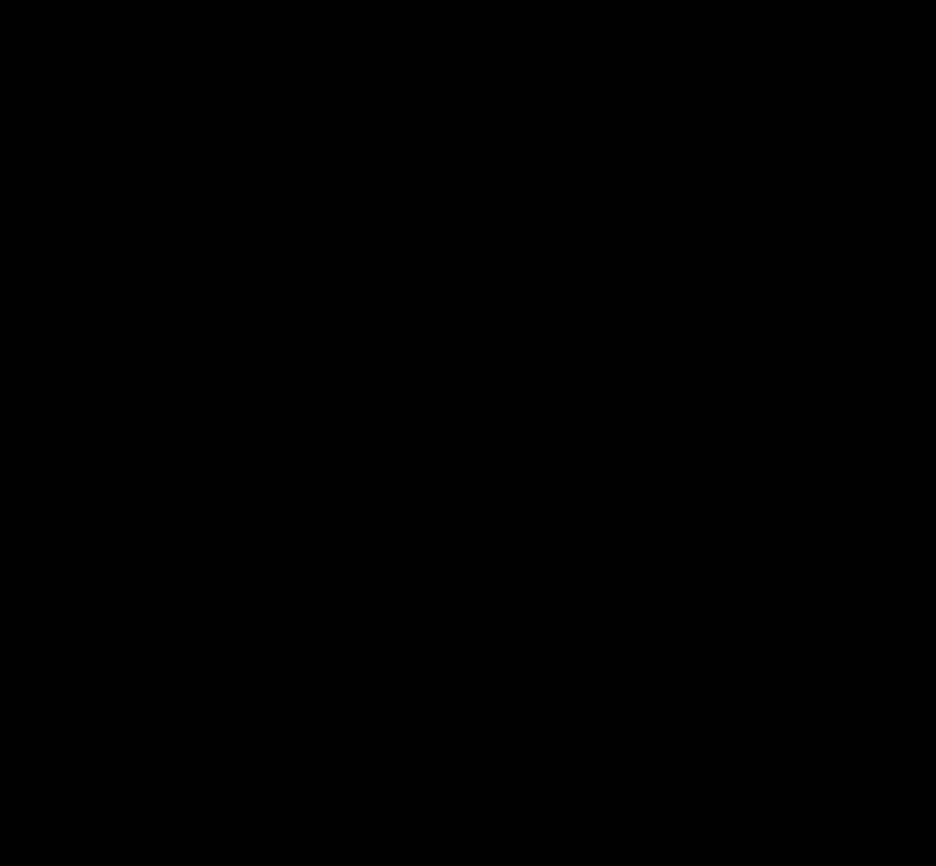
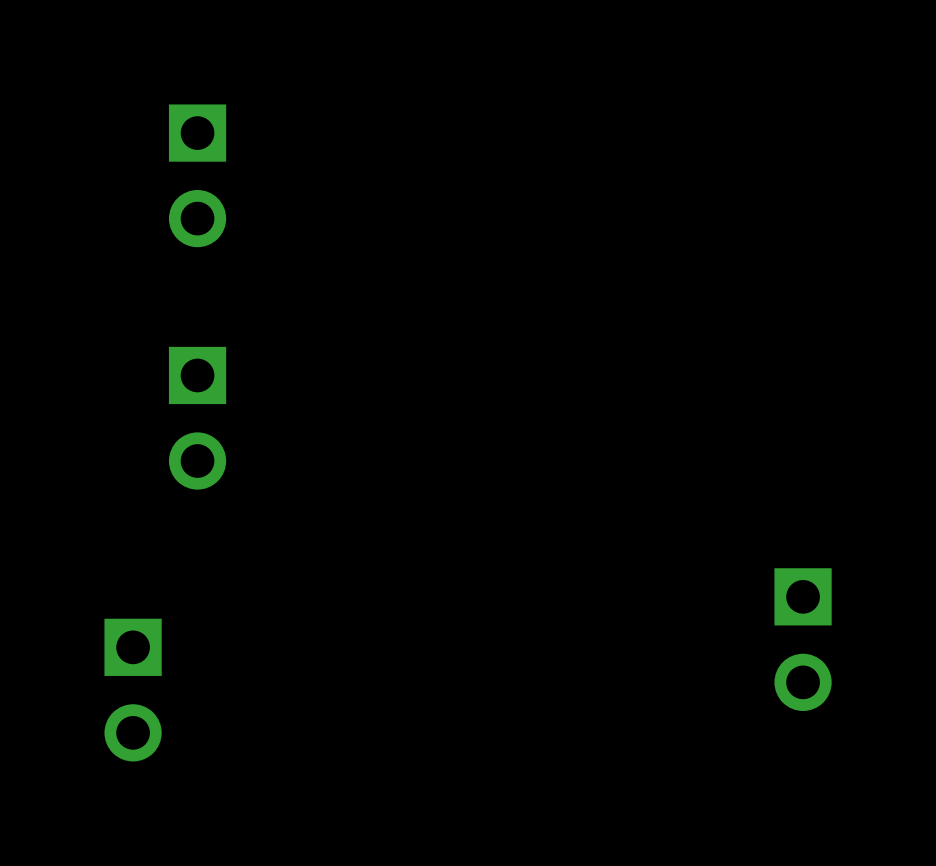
part: none -> (197, 175)
part: none -> (197, 418)
part: none -> (803, 639)
part: none -> (133, 690)

